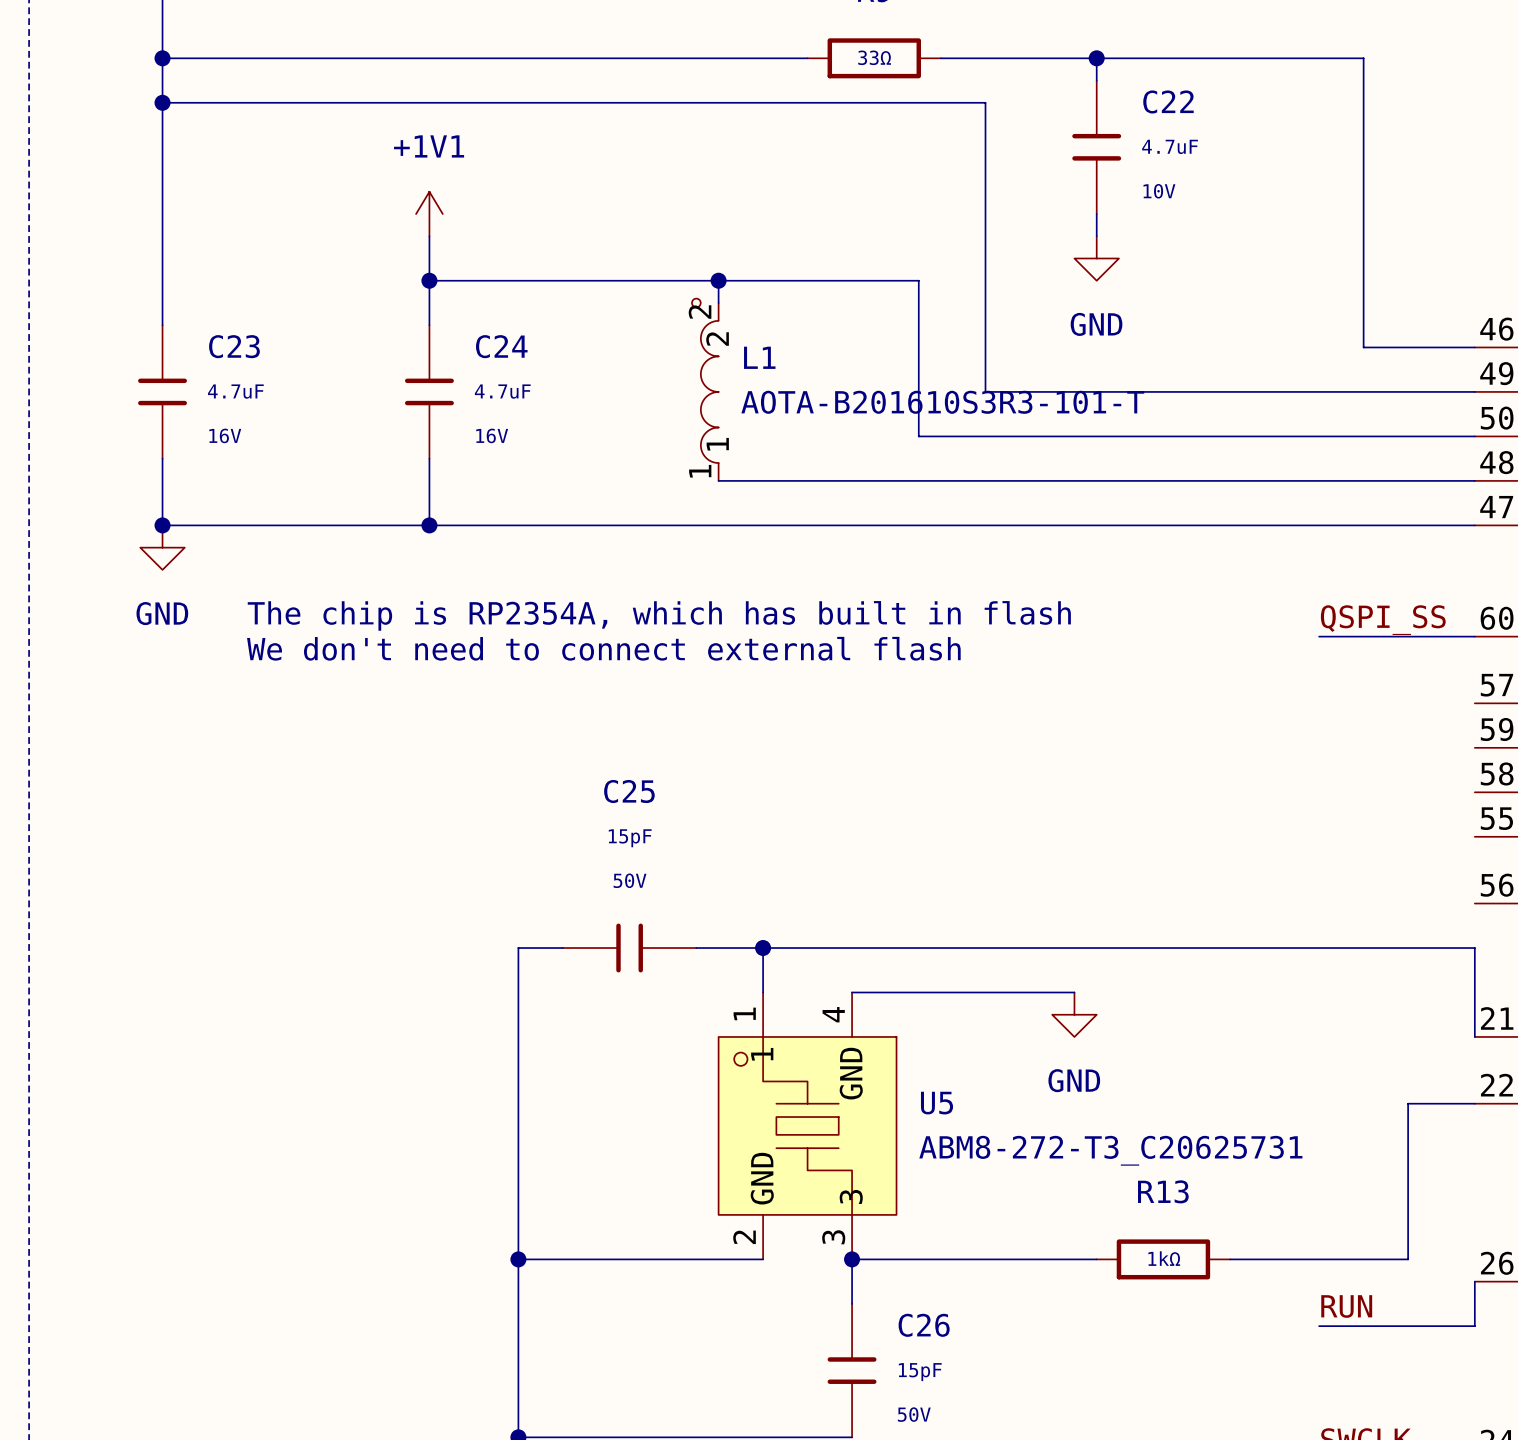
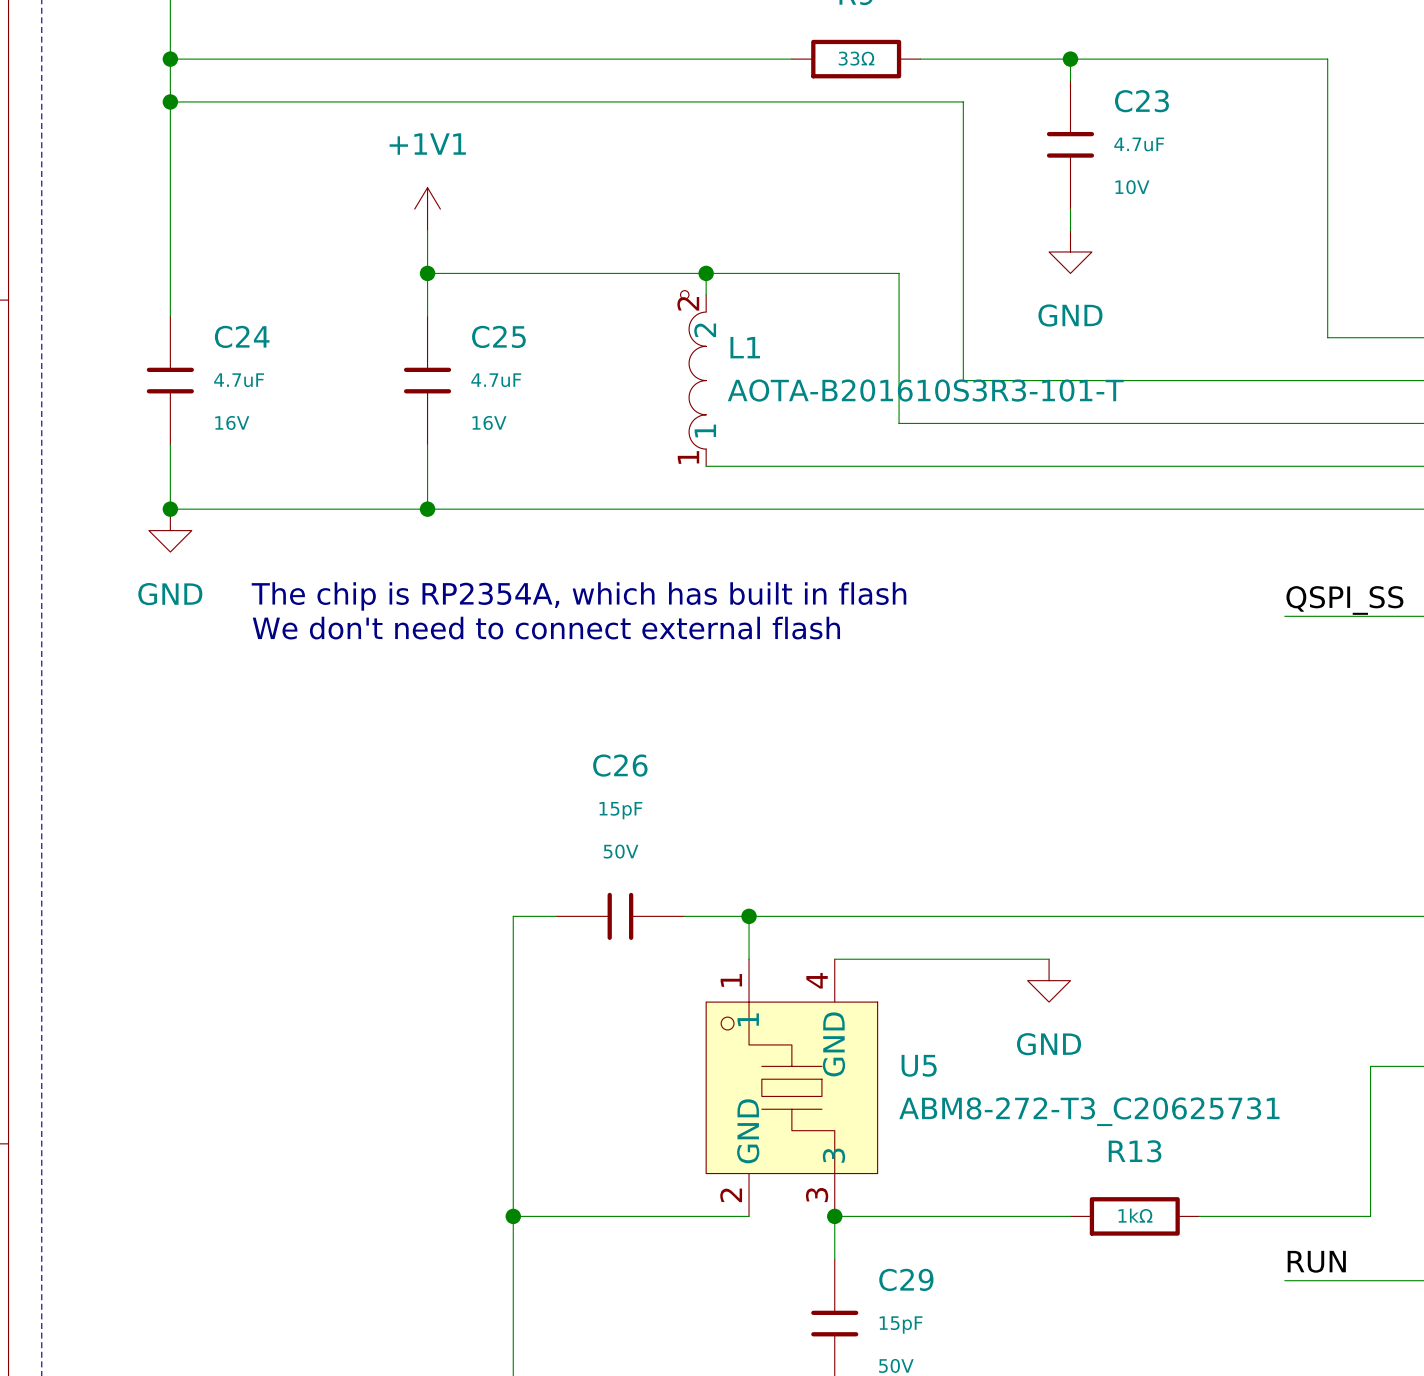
C22 name: C22 (1168, 101) -> C23 (1141, 101)
C23 name: C23 (234, 346) -> C24 (242, 336)
C24 name: C24 (501, 346) -> C25 (498, 336)
C25 name: C25 (629, 791) -> C26 (620, 765)
C26 name: C26 (924, 1325) -> C29 (906, 1279)

